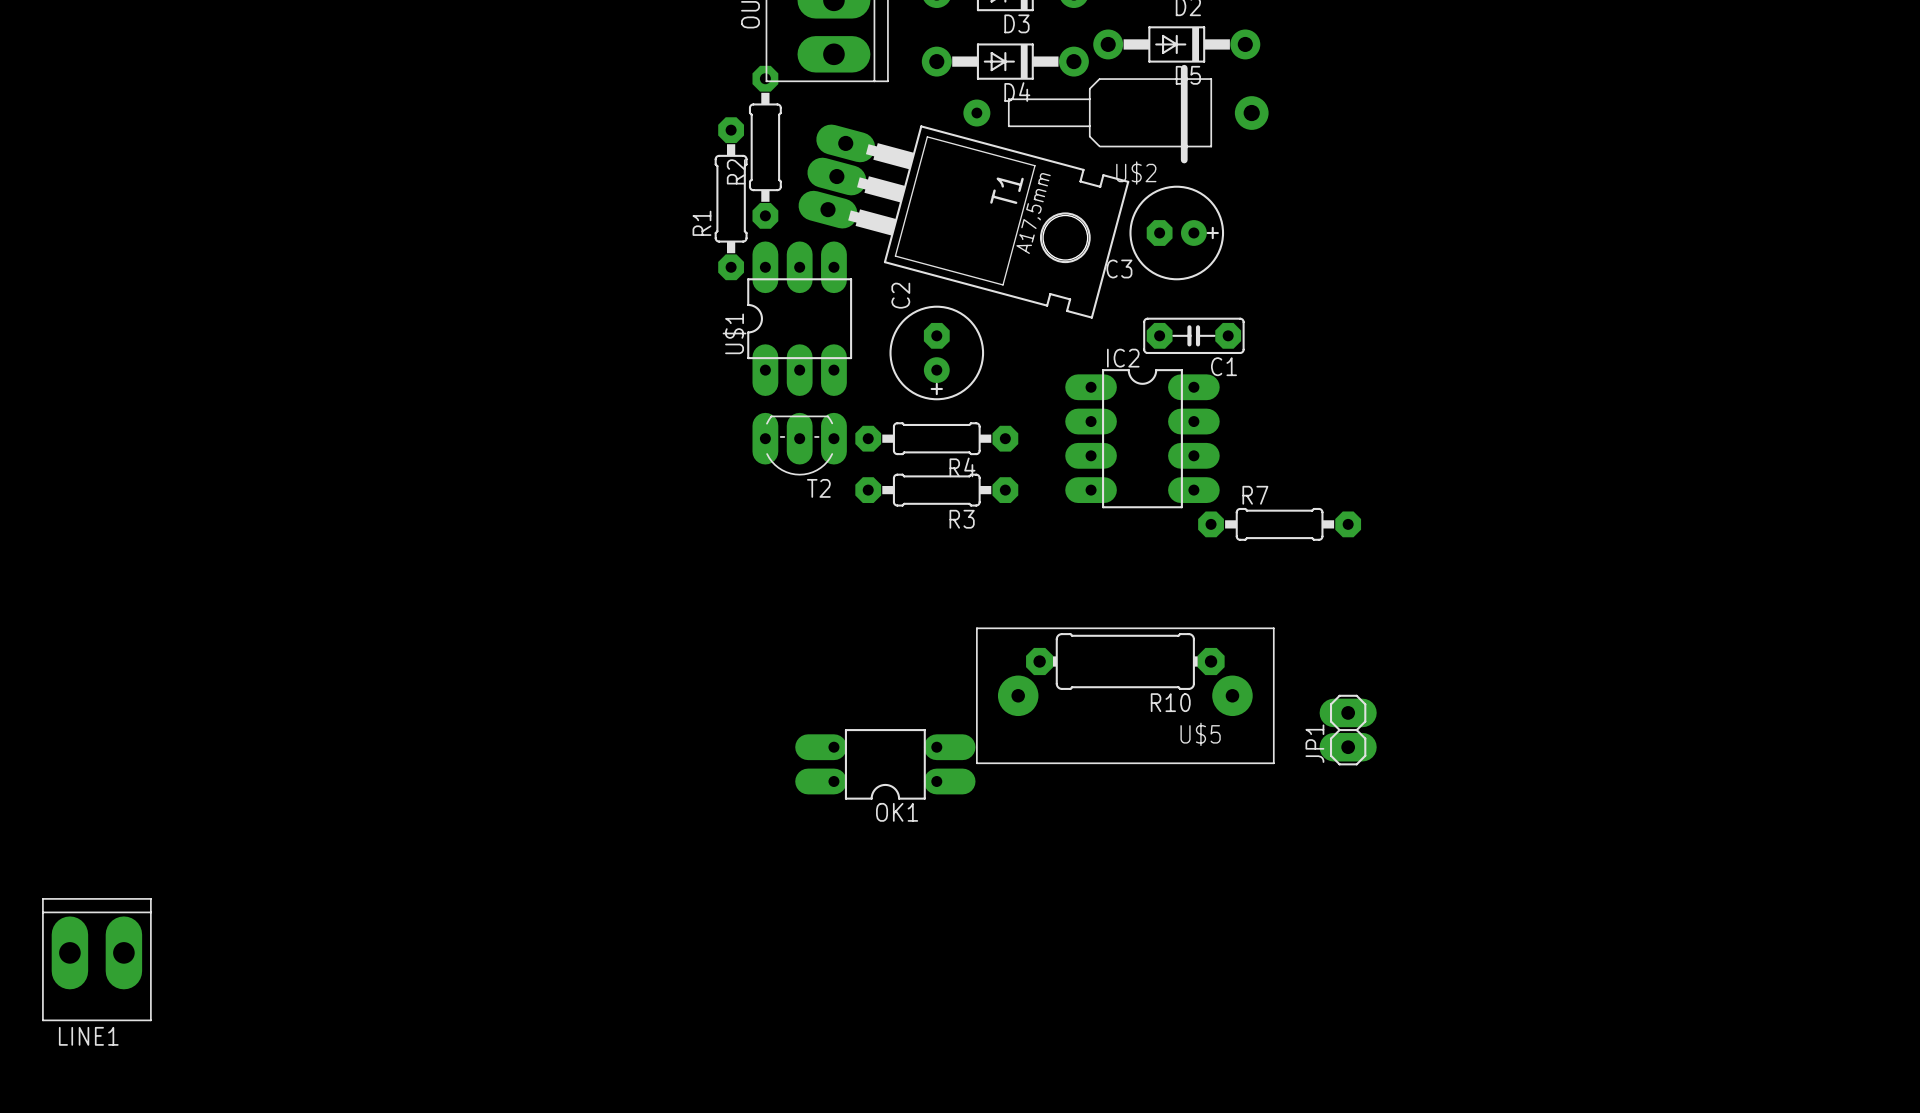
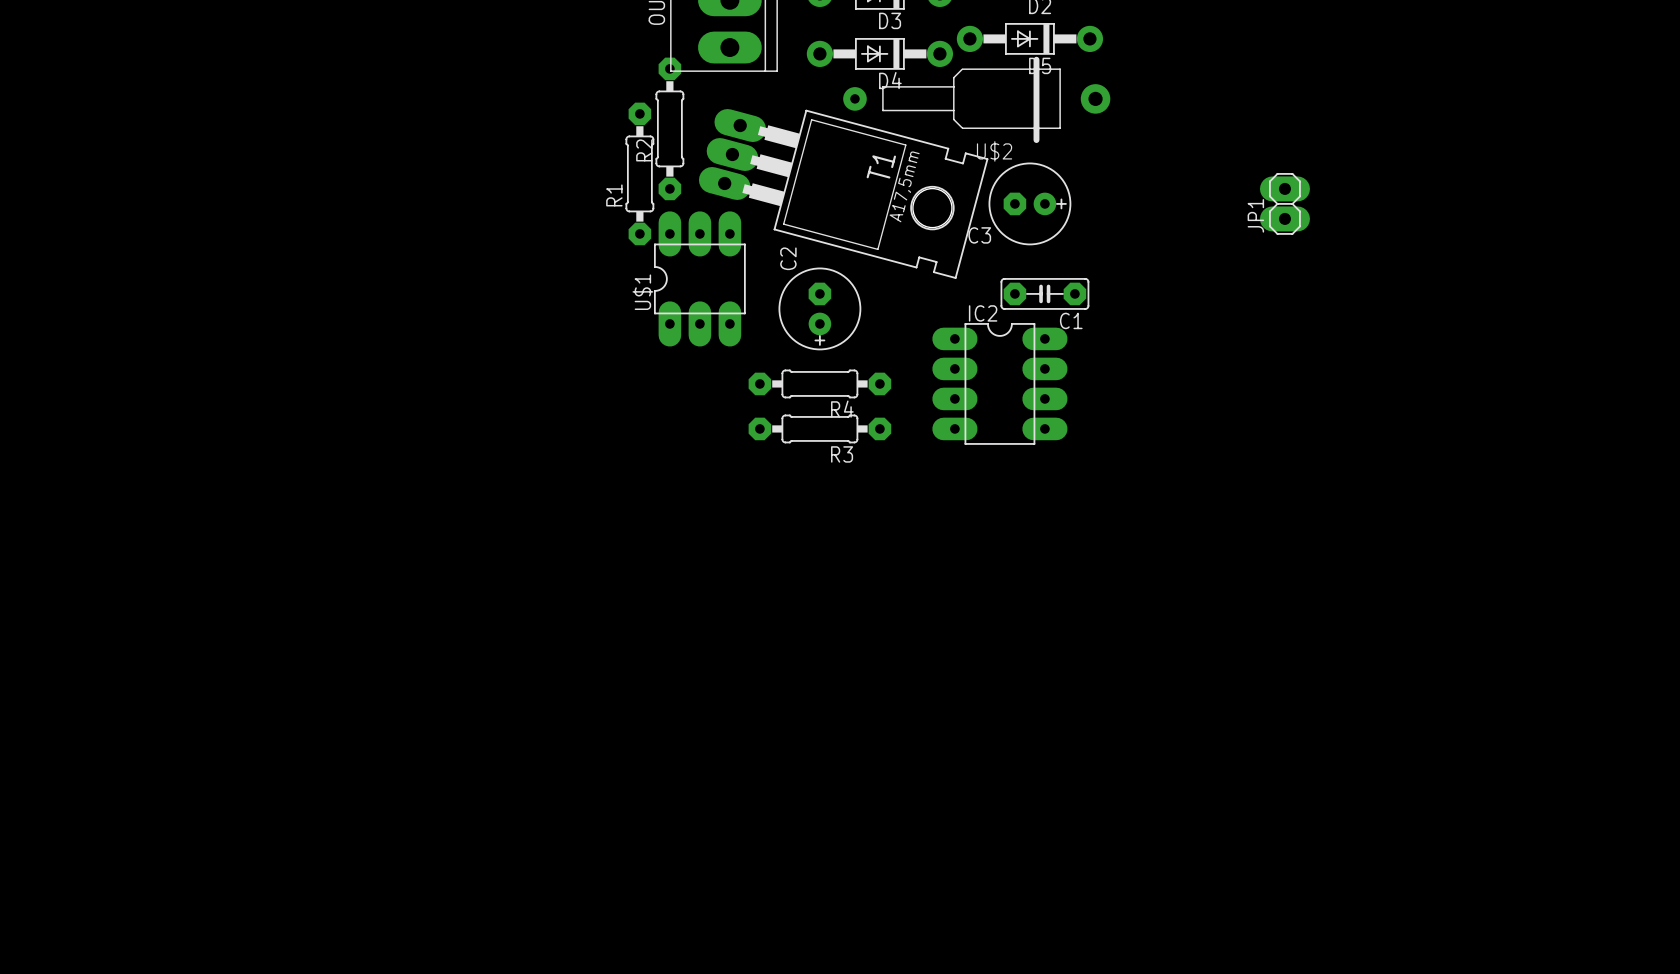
T2: (799, 444) -> none
R7: (1279, 524) -> none
R10: (1125, 661) -> none
U$5: (1125, 695) -> none
JP1 position: (1348, 730) -> (1284, 203)
OK1: (885, 764) -> none
LINE1: (96, 959) -> none

